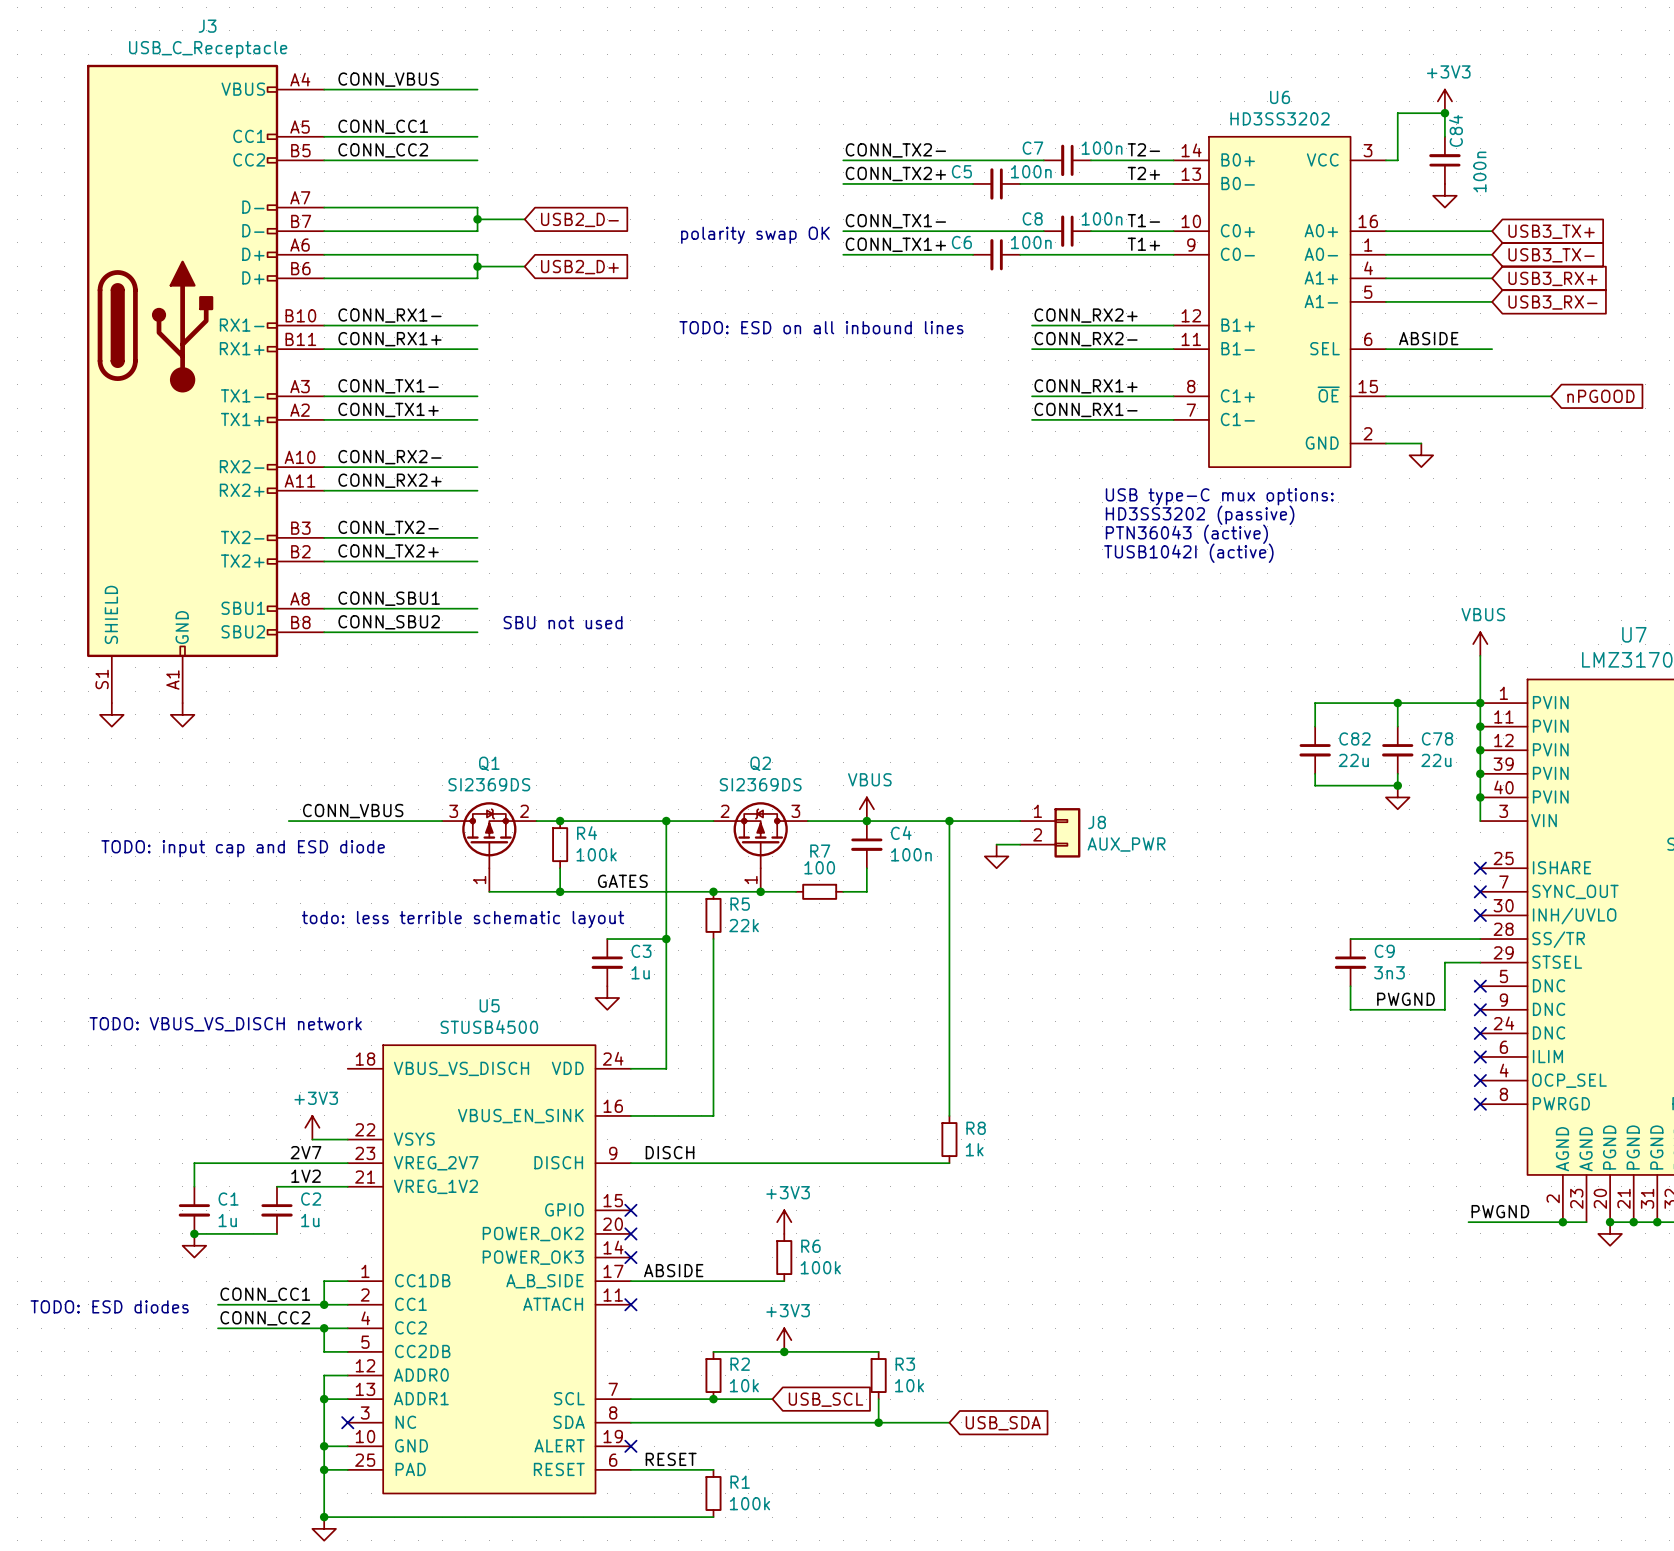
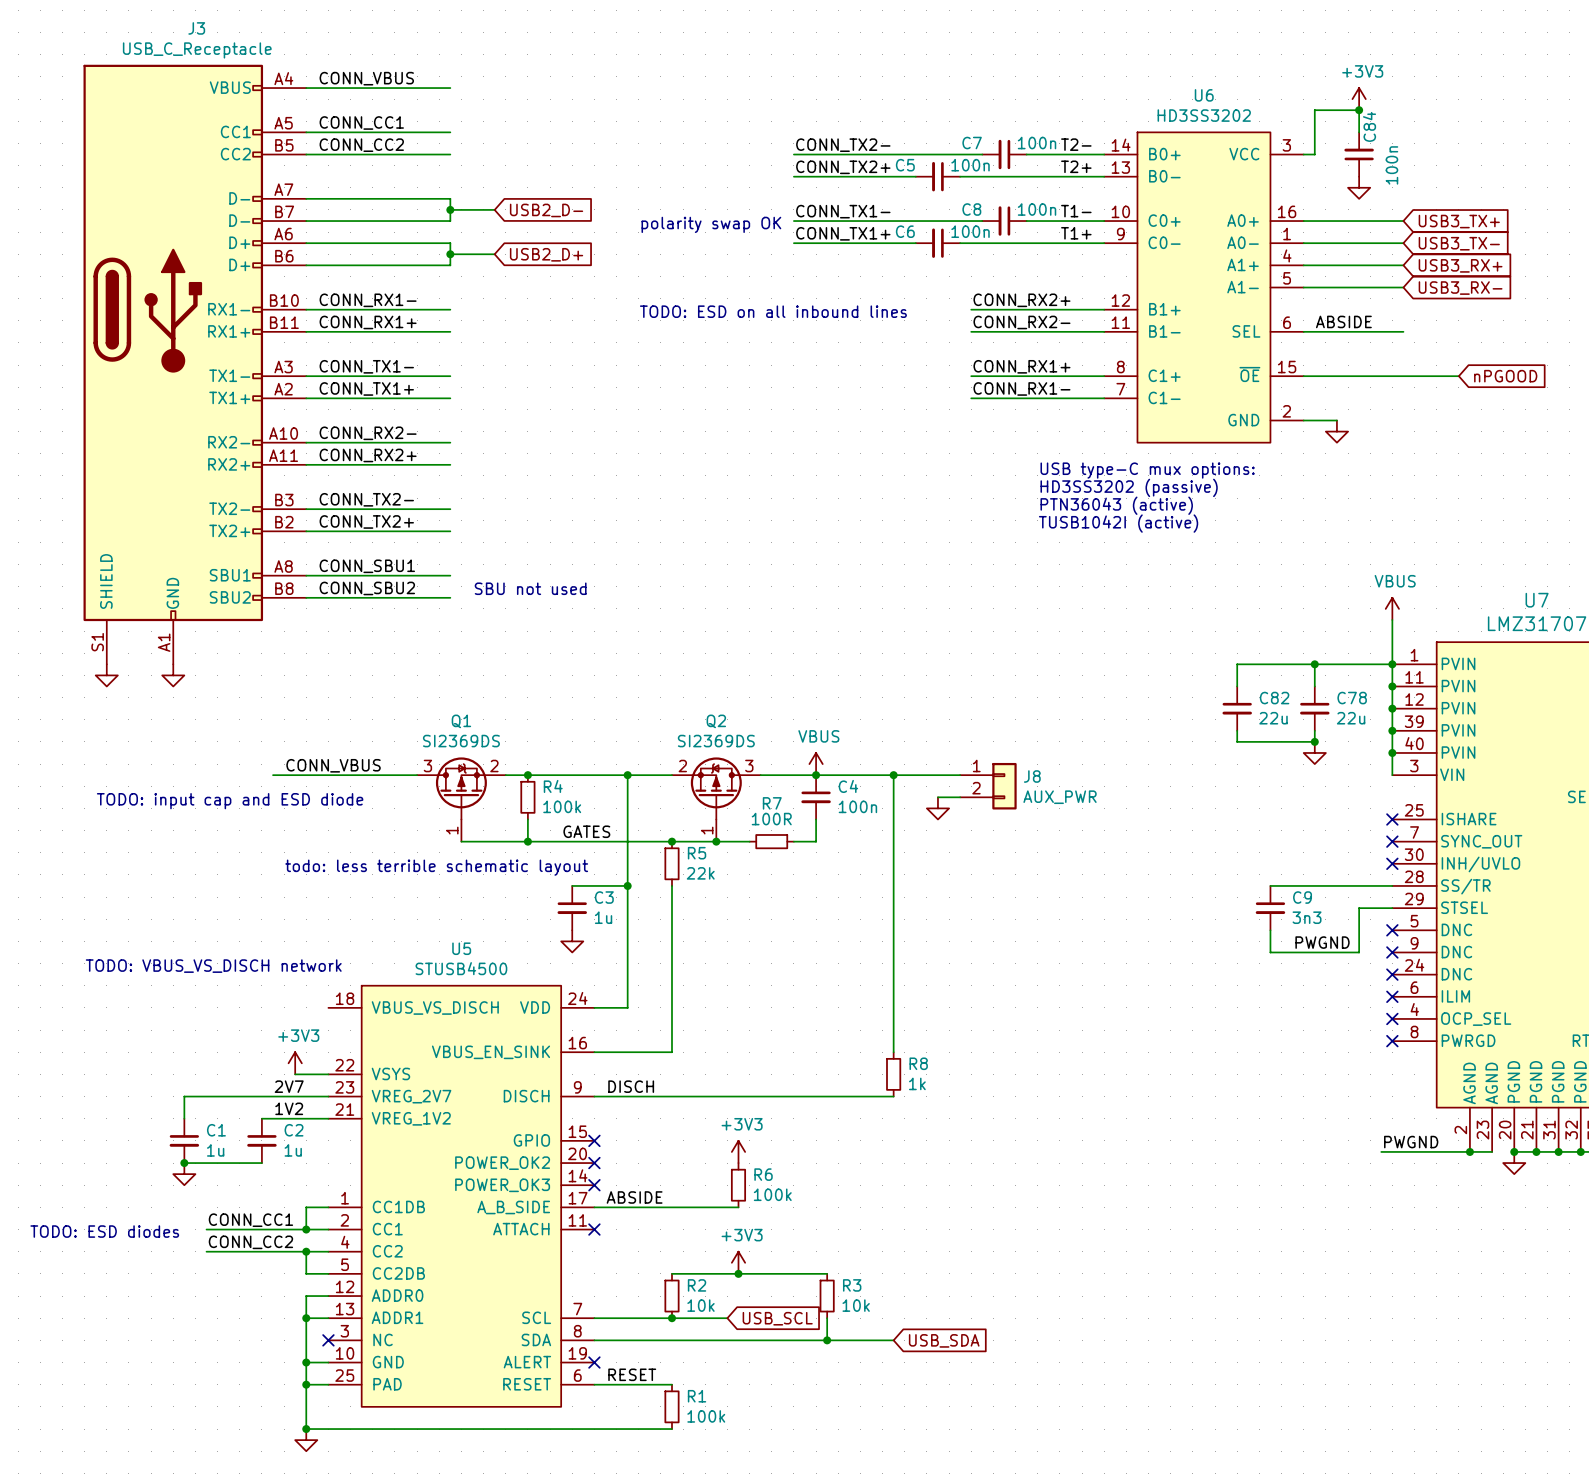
R7 value: 100 (819, 867) -> 100R (771, 819)

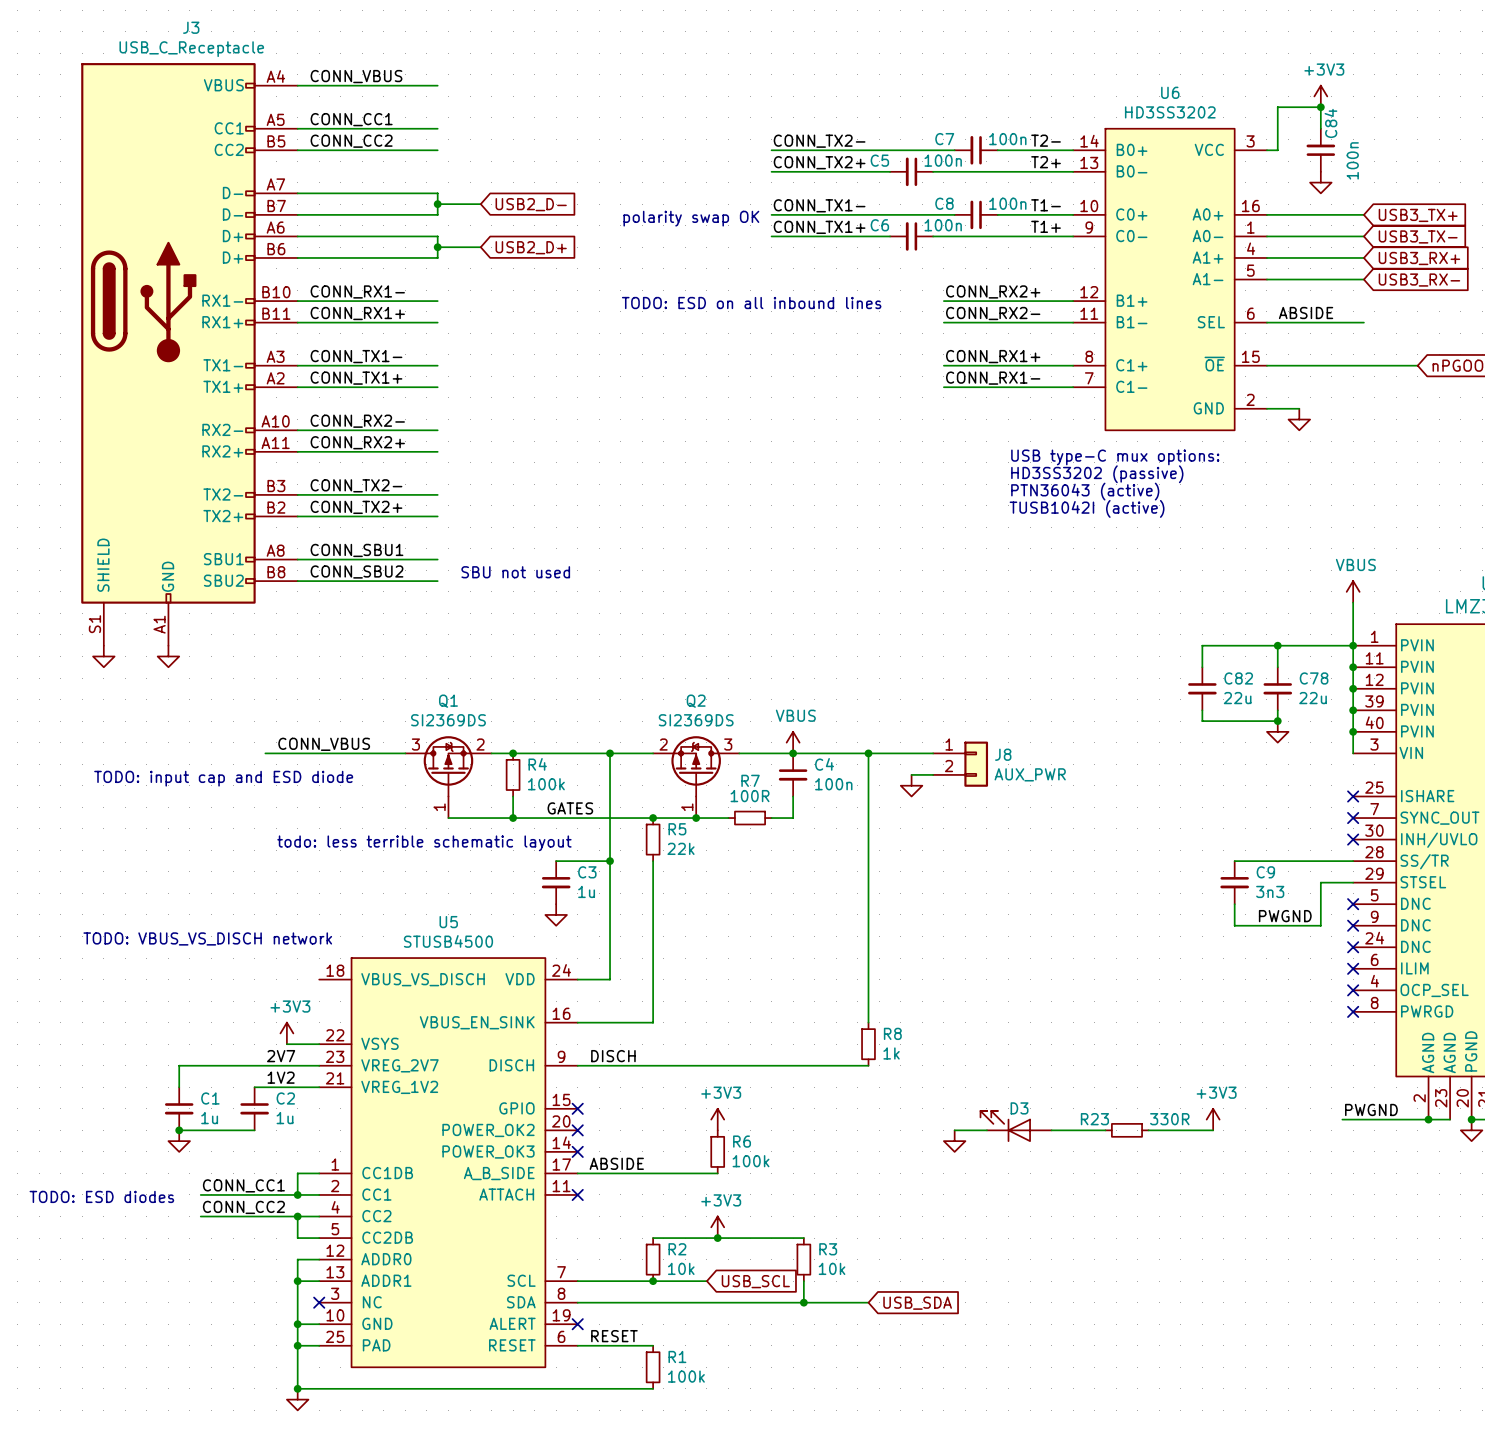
power symbol: none -> +3V3 (1213, 1119)
D3: none -> (1016, 1126)
wire: none -> (954, 1130) (986, 1130)
wire: none -> (1051, 1130) (1105, 1130)
R23: none -> 330R (1126, 1130)
wire: none -> (1148, 1130) (1213, 1130)
power symbol: none -> (954, 1141)

